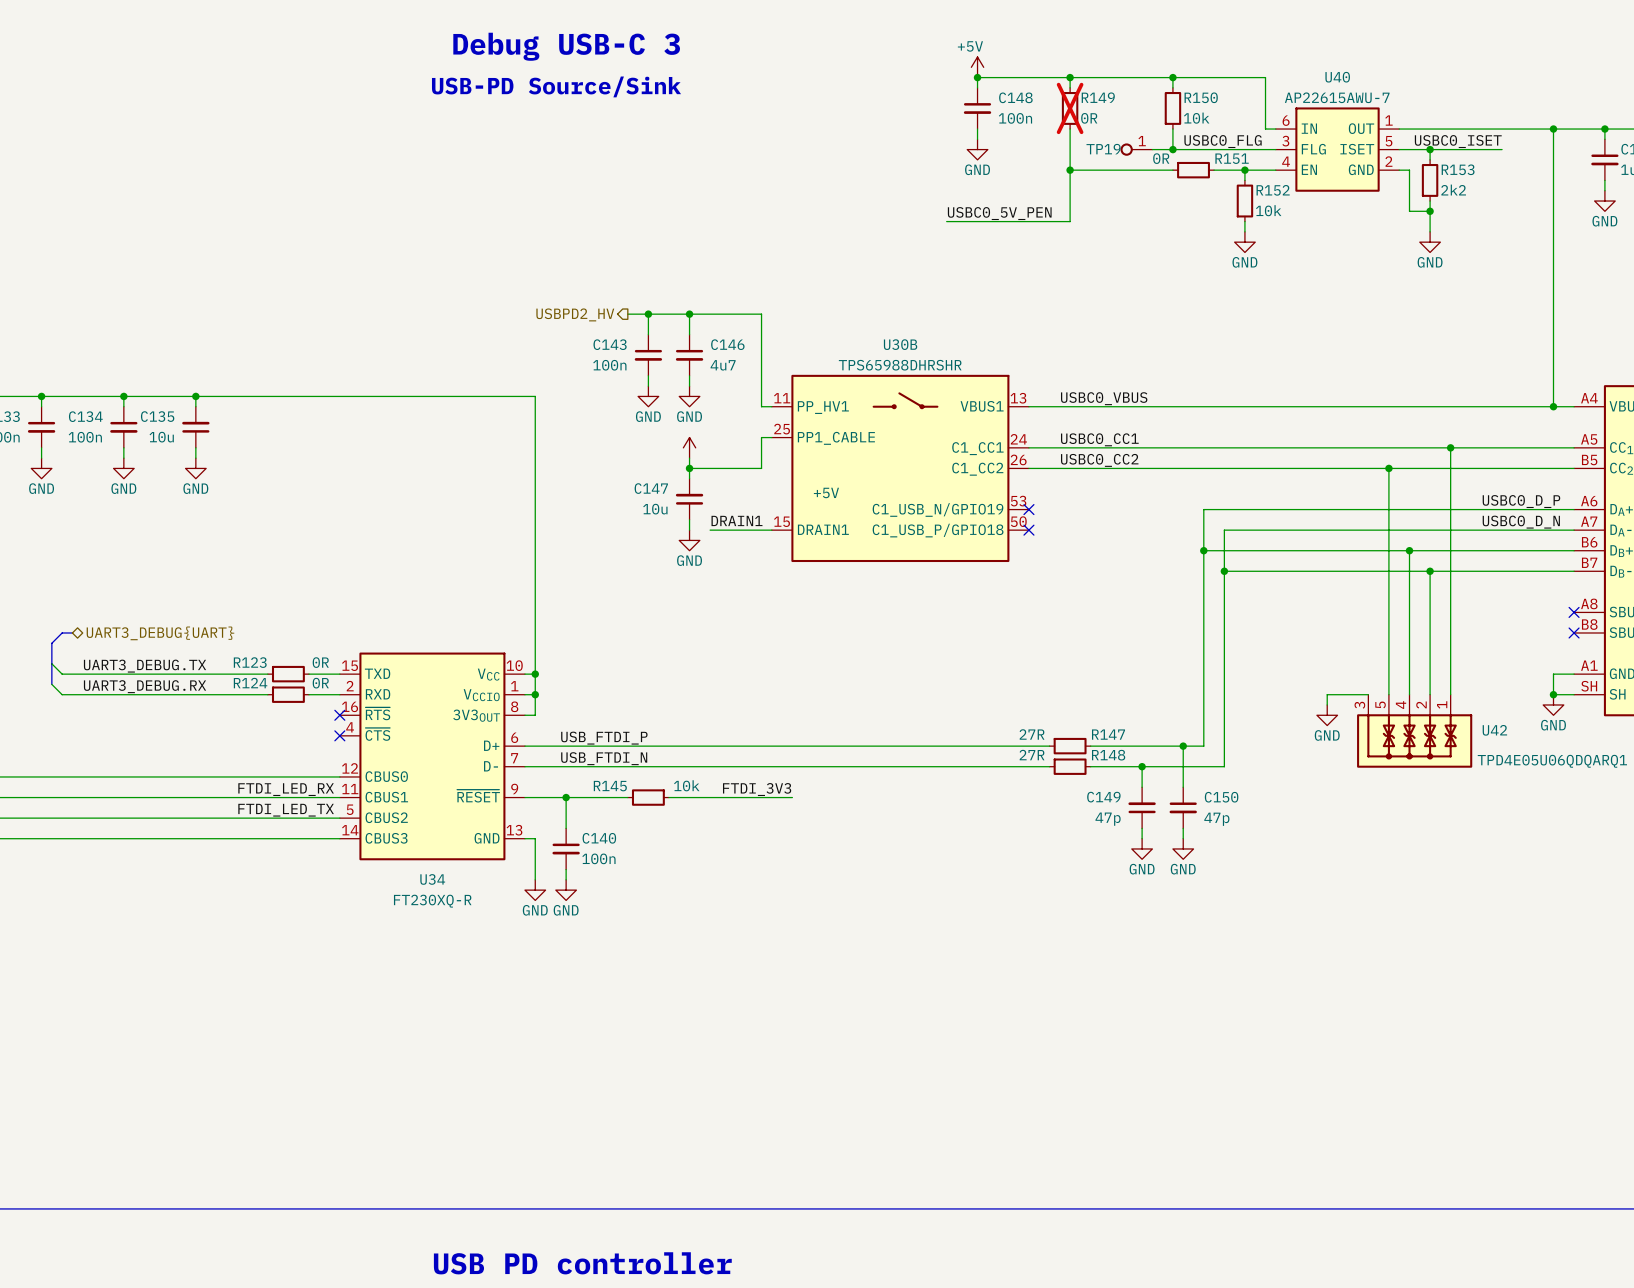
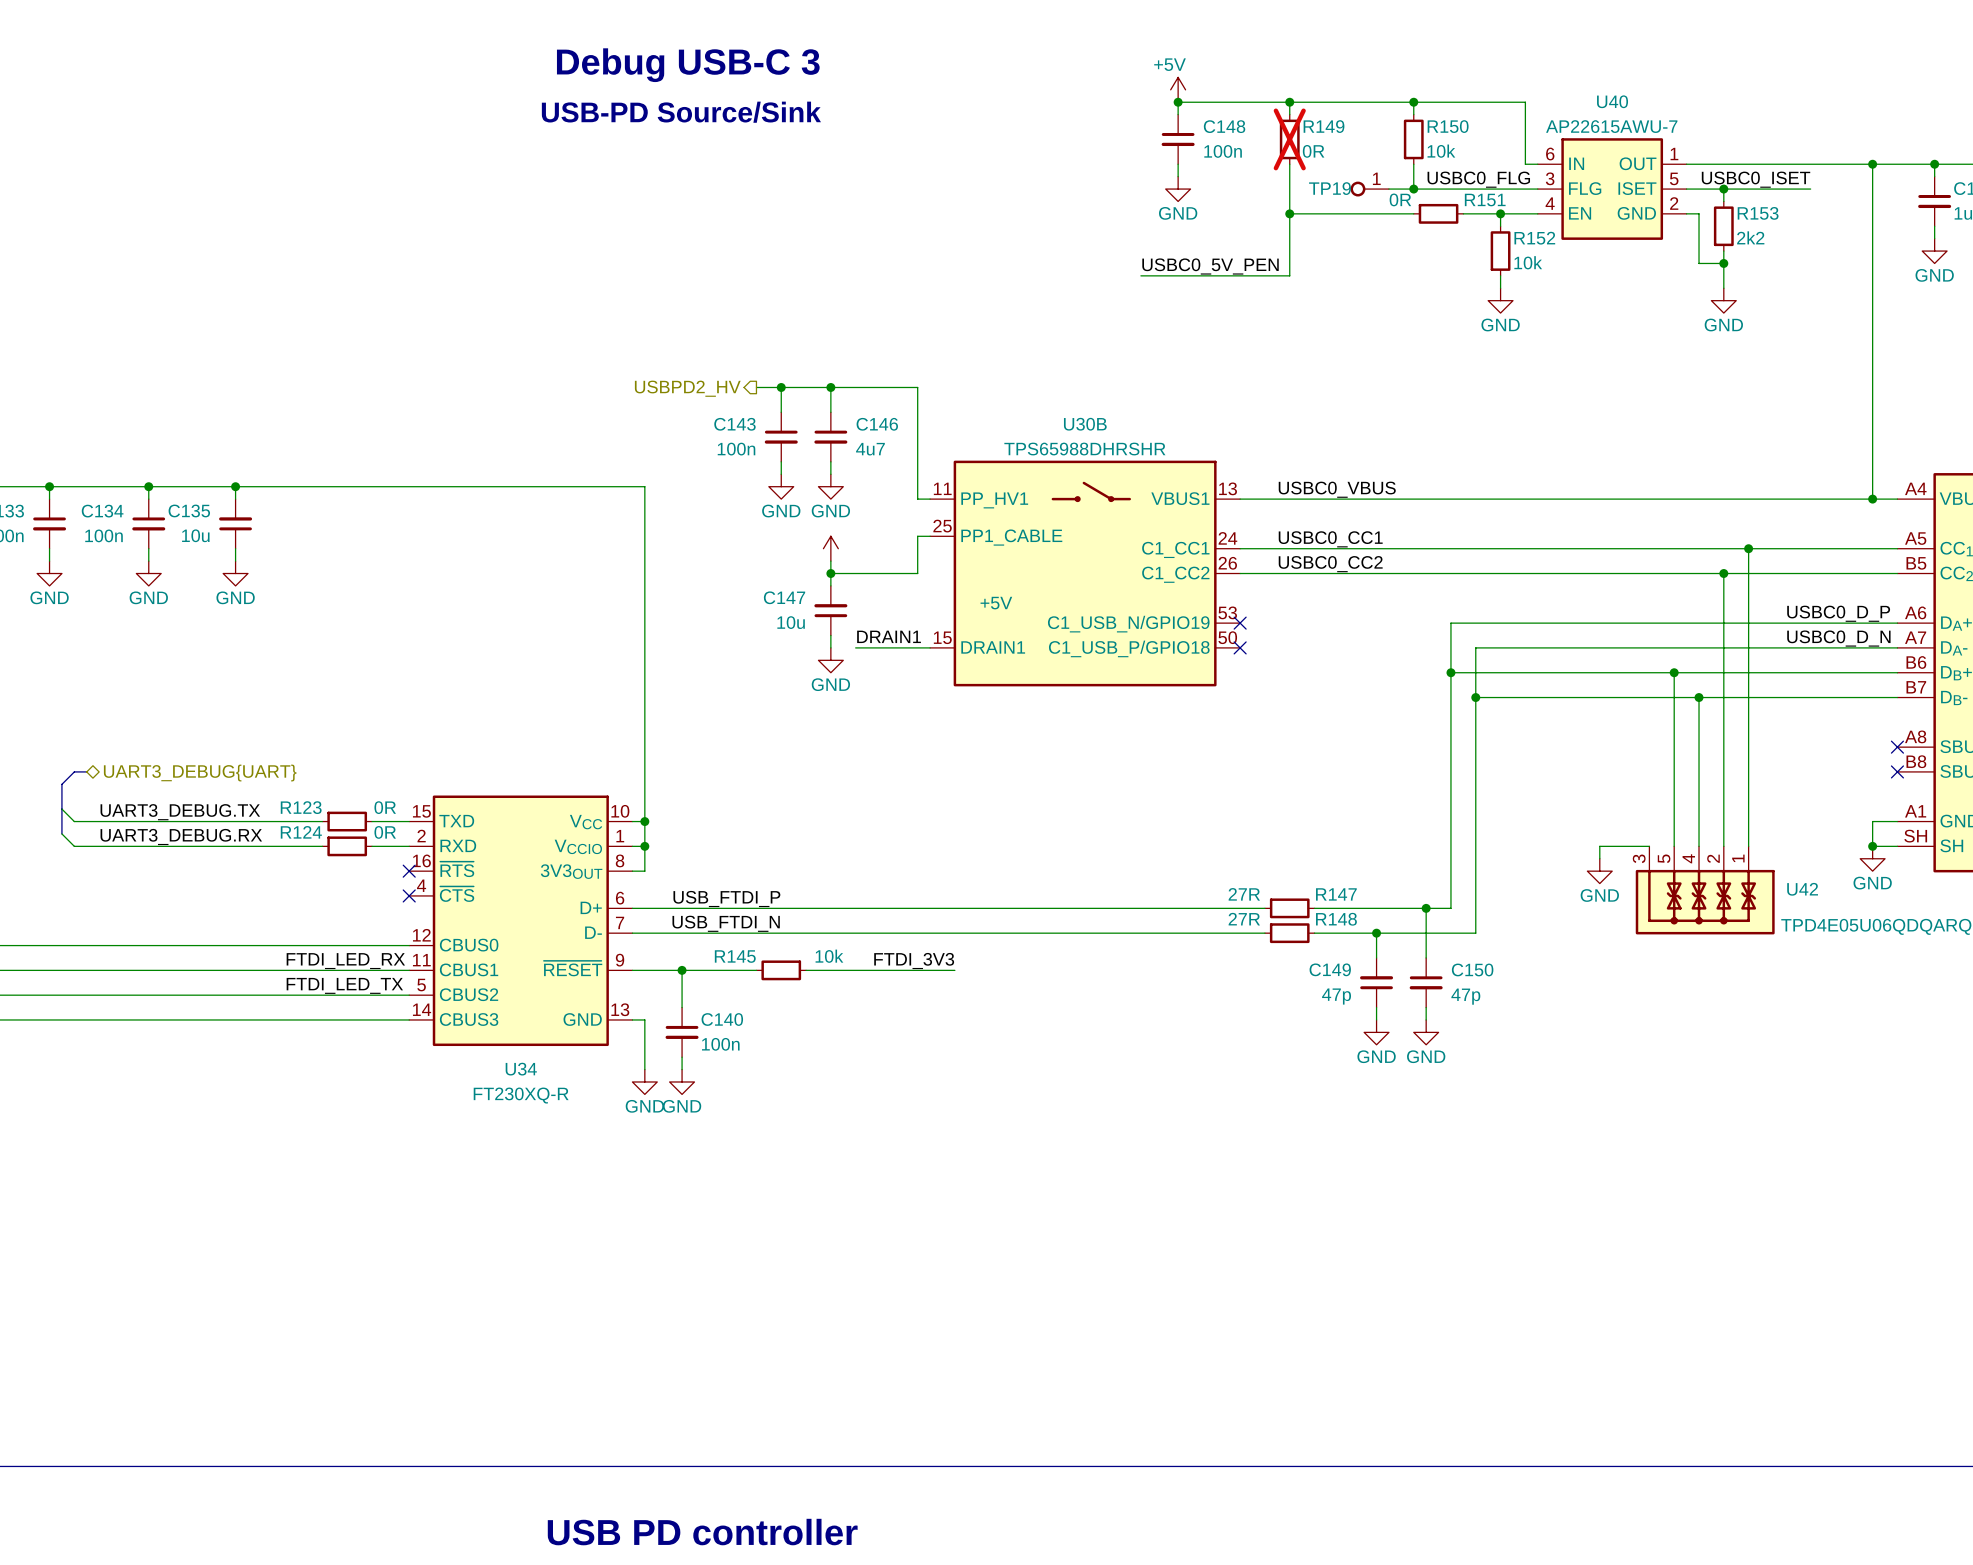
wire: (1388, 468) (1388, 550) -> none
junction: (1388, 468) -> none
wire: none -> (1723, 573) (1723, 697)
junction: none -> (1723, 573)
junction: none -> (1674, 672)
wire: (1409, 550) (1409, 571) -> none
junction: (1409, 550) -> none
junction: none -> (1699, 697)
junction: (1430, 571) -> none

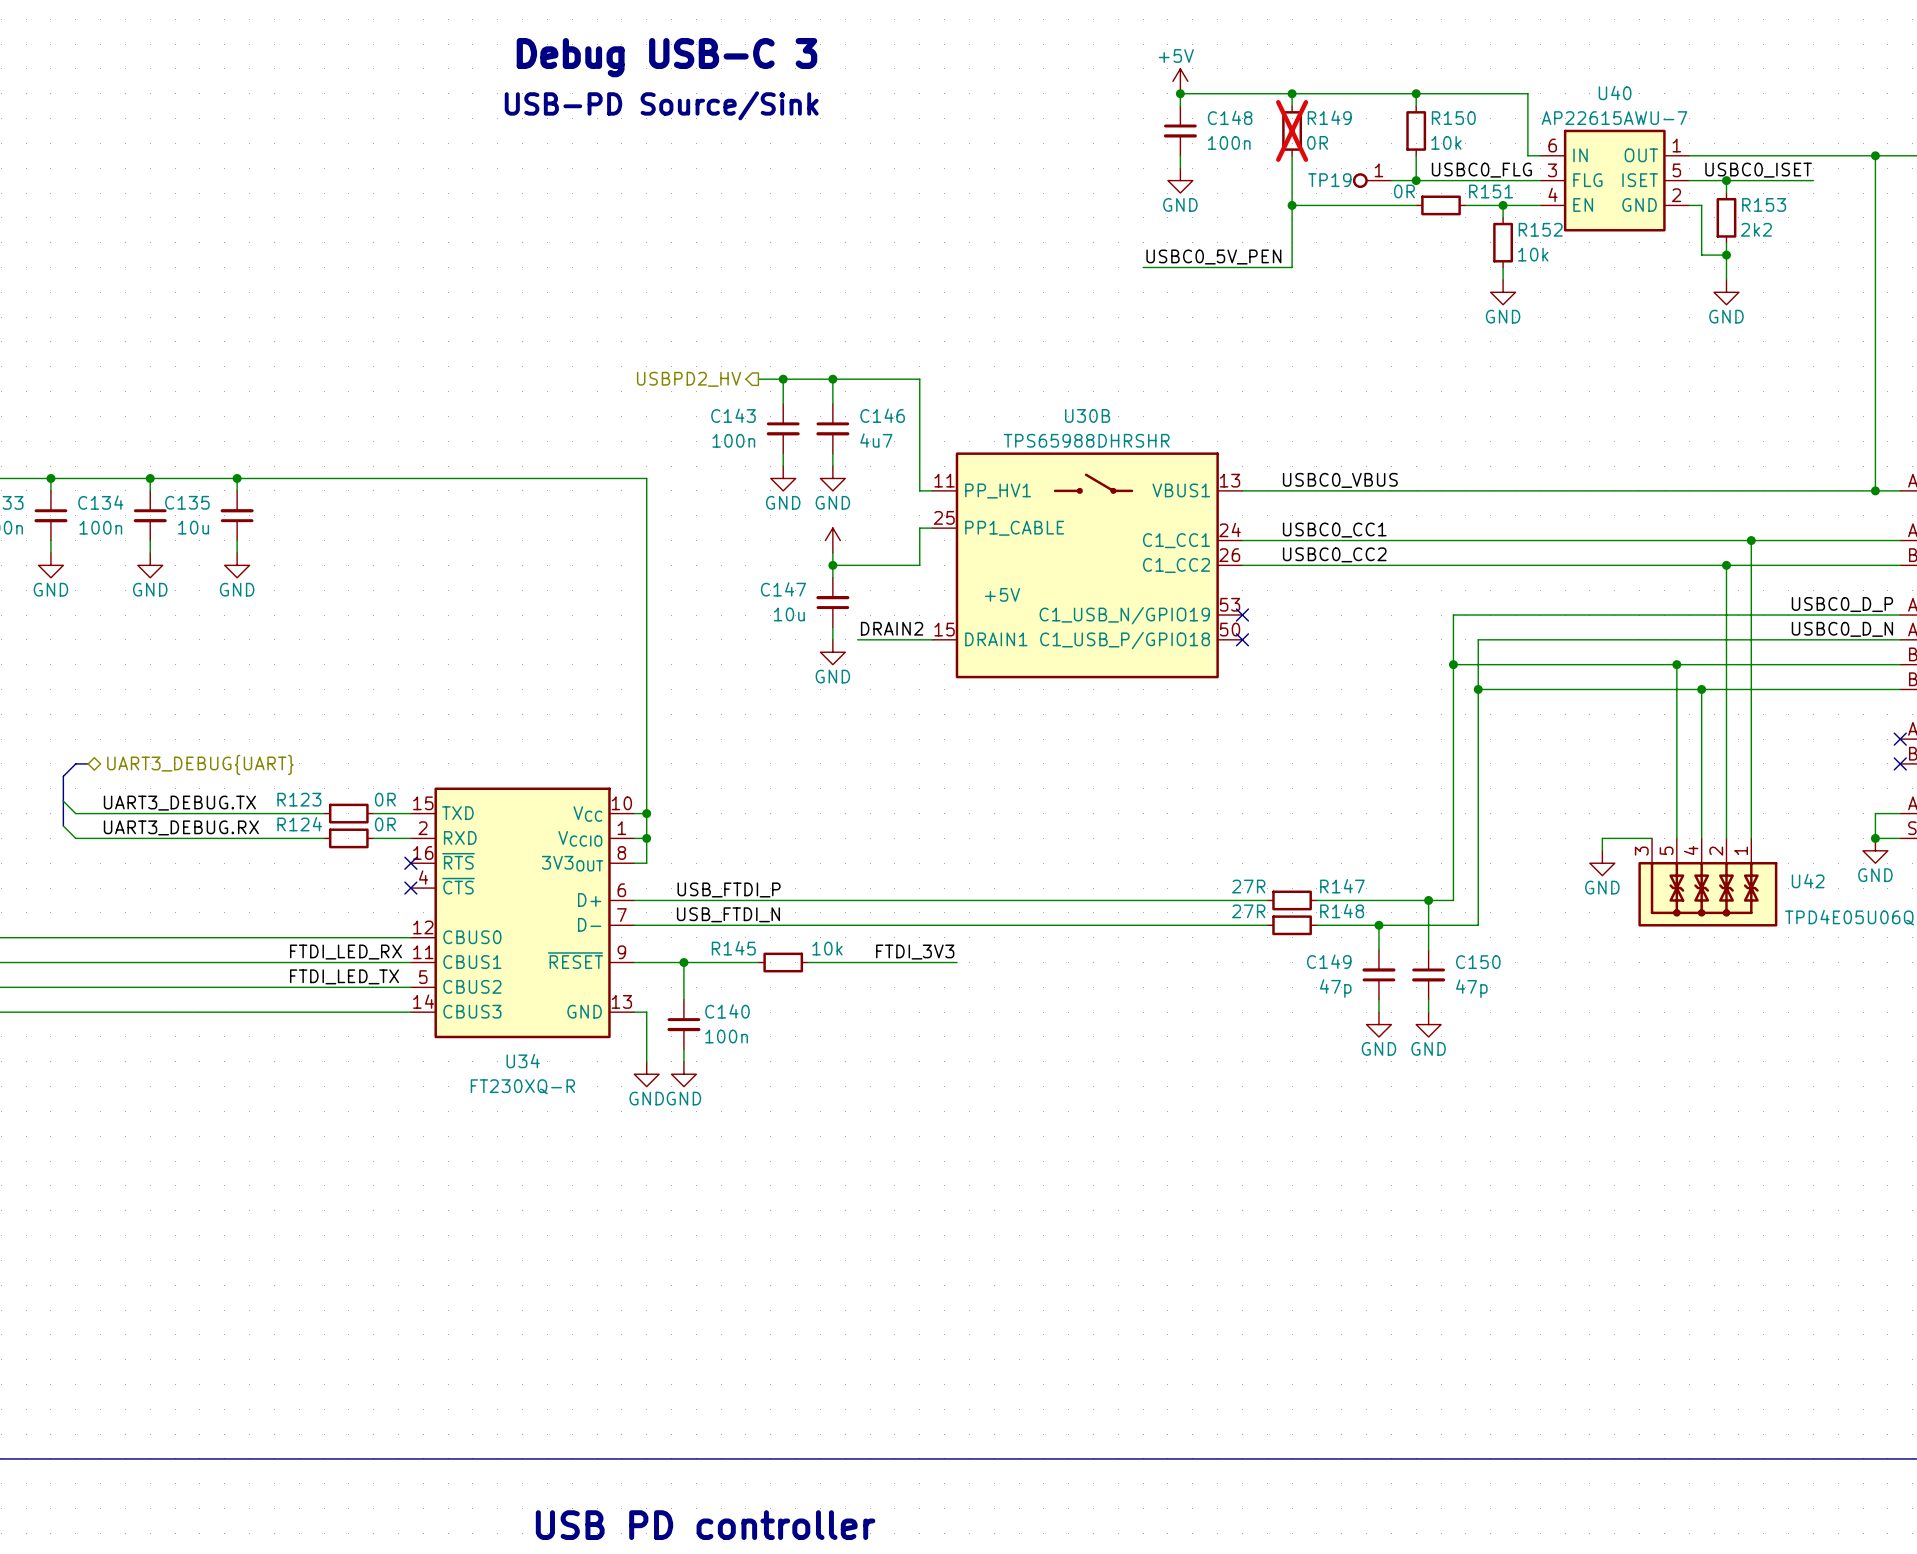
label: DRAIN1 (889, 636) -> DRAIN2 (892, 628)

